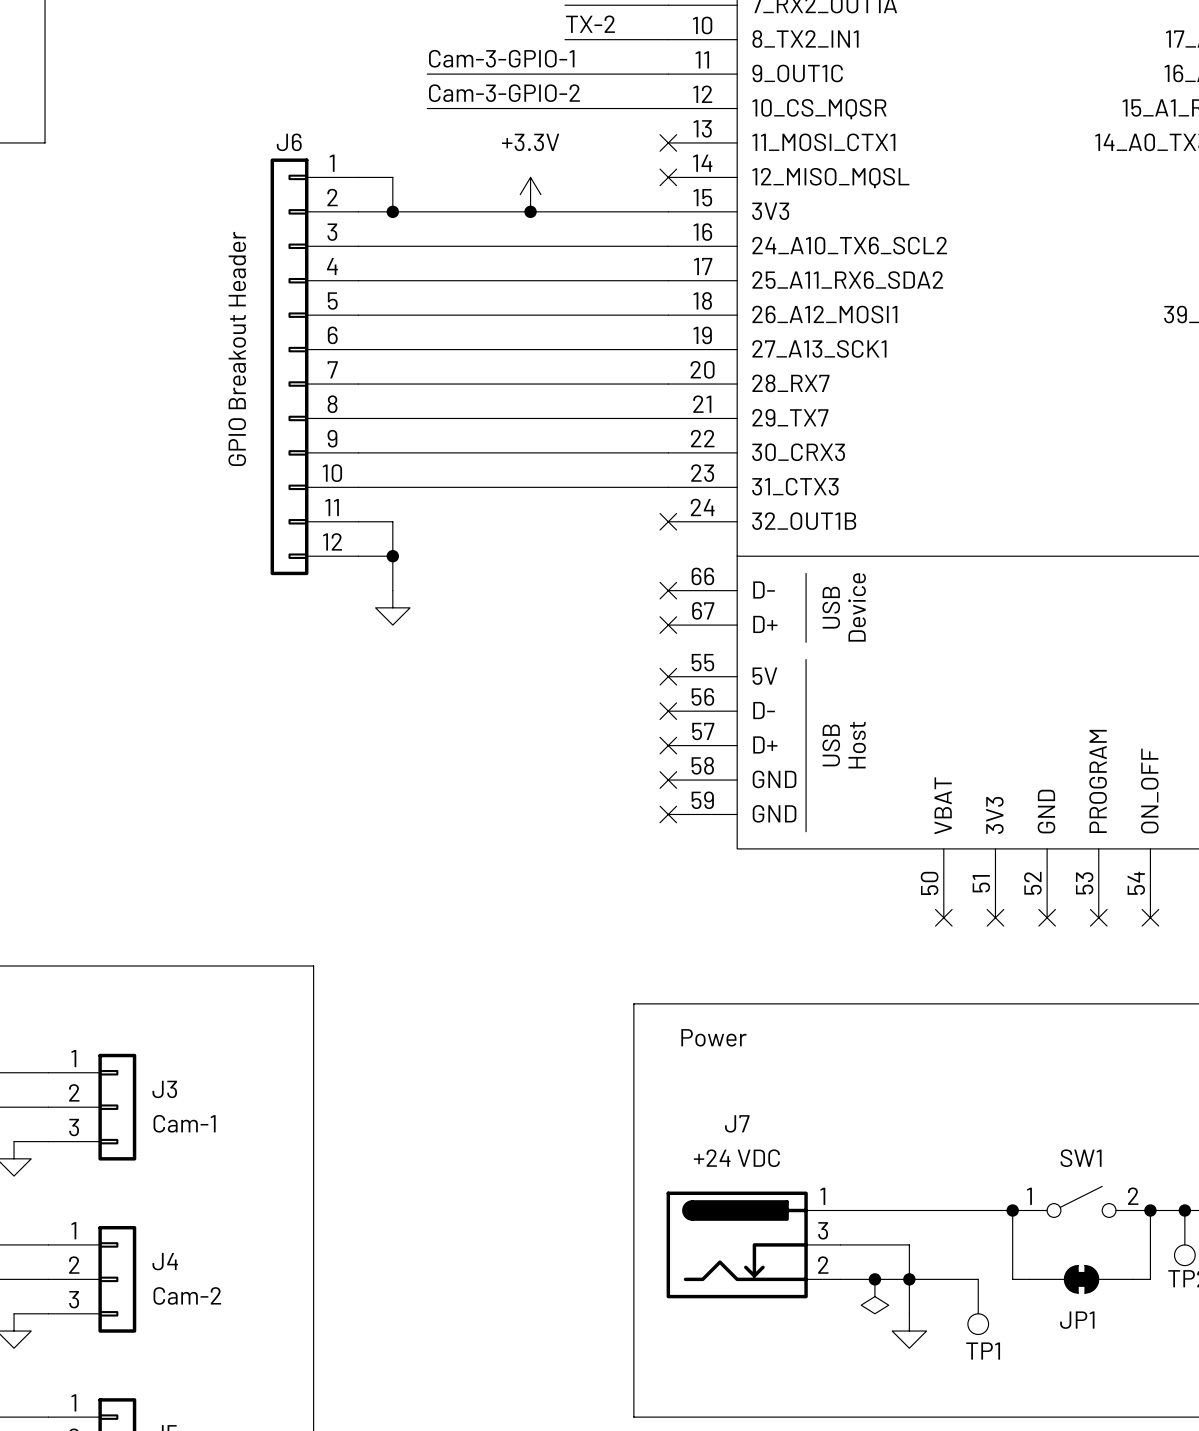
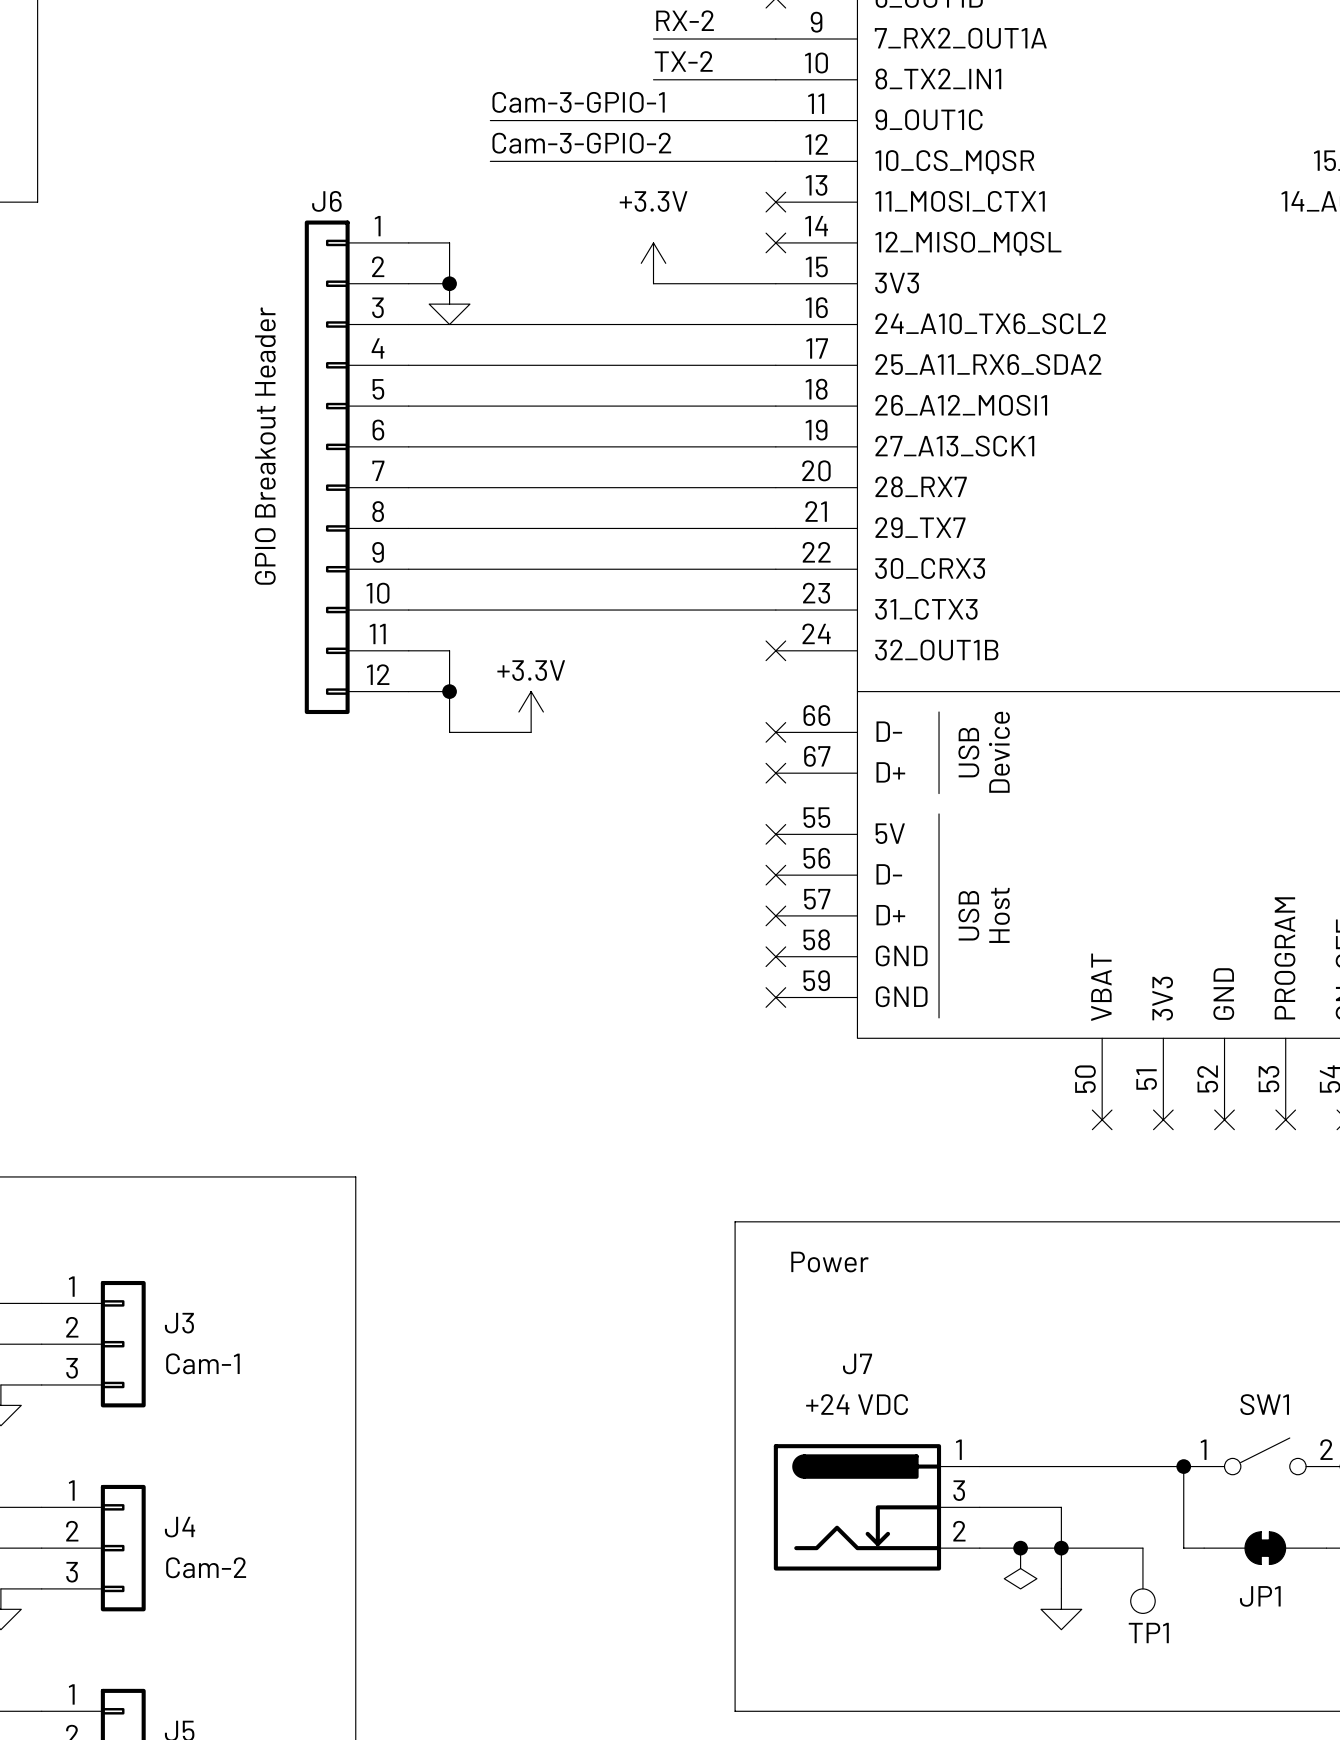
power symbol position: +3.3V (530, 194) -> +3.3V (653, 263)
wire: (392, 211) (565, 211) -> none
junction: (530, 211) -> none
power symbol: none -> (449, 304)
power symbol: none -> +3.3V (531, 711)
wire: none -> (449, 732) (531, 732)
power symbol: (392, 607) -> none

